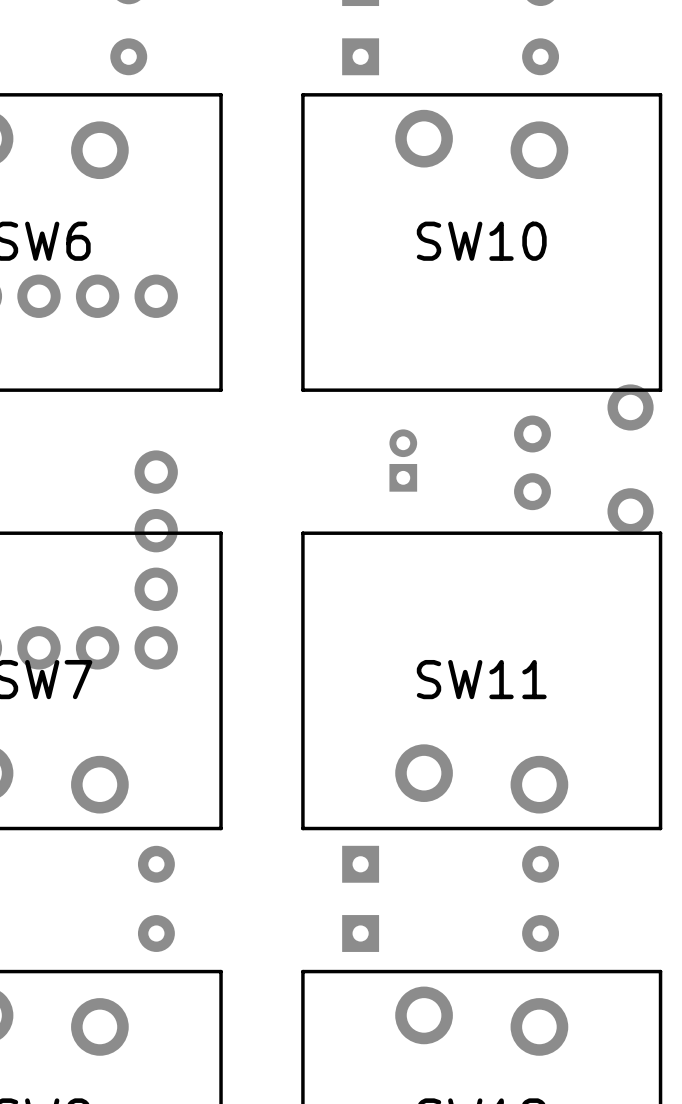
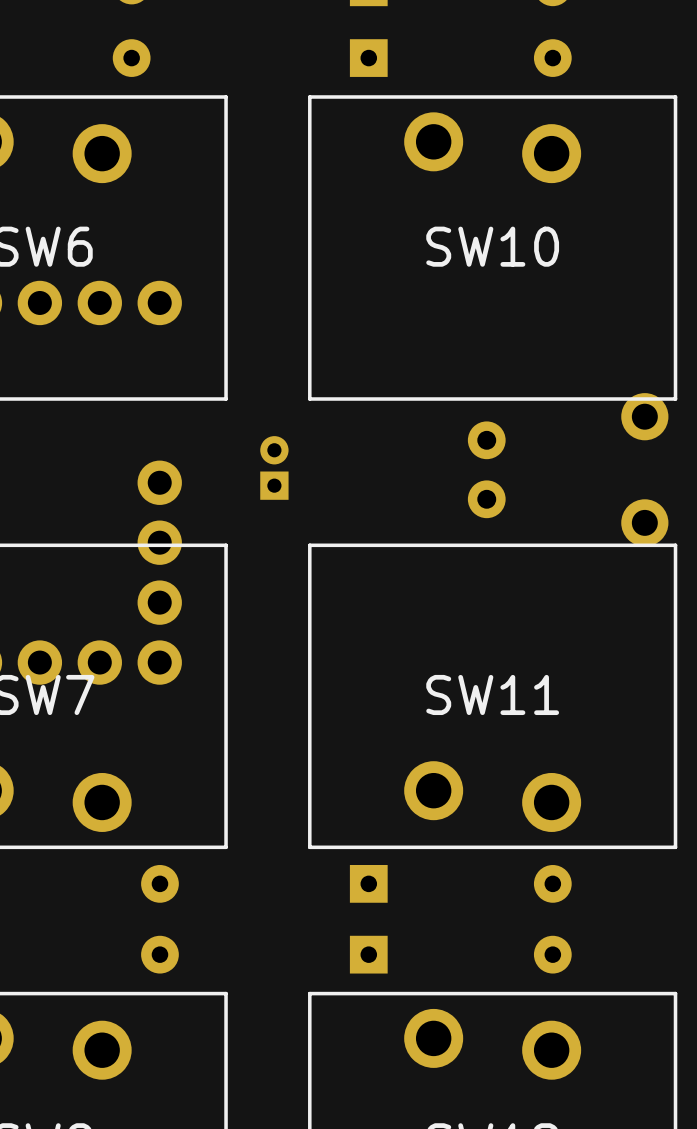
part position: (403, 460) -> (274, 467)
part position: (532, 462) -> (486, 469)

